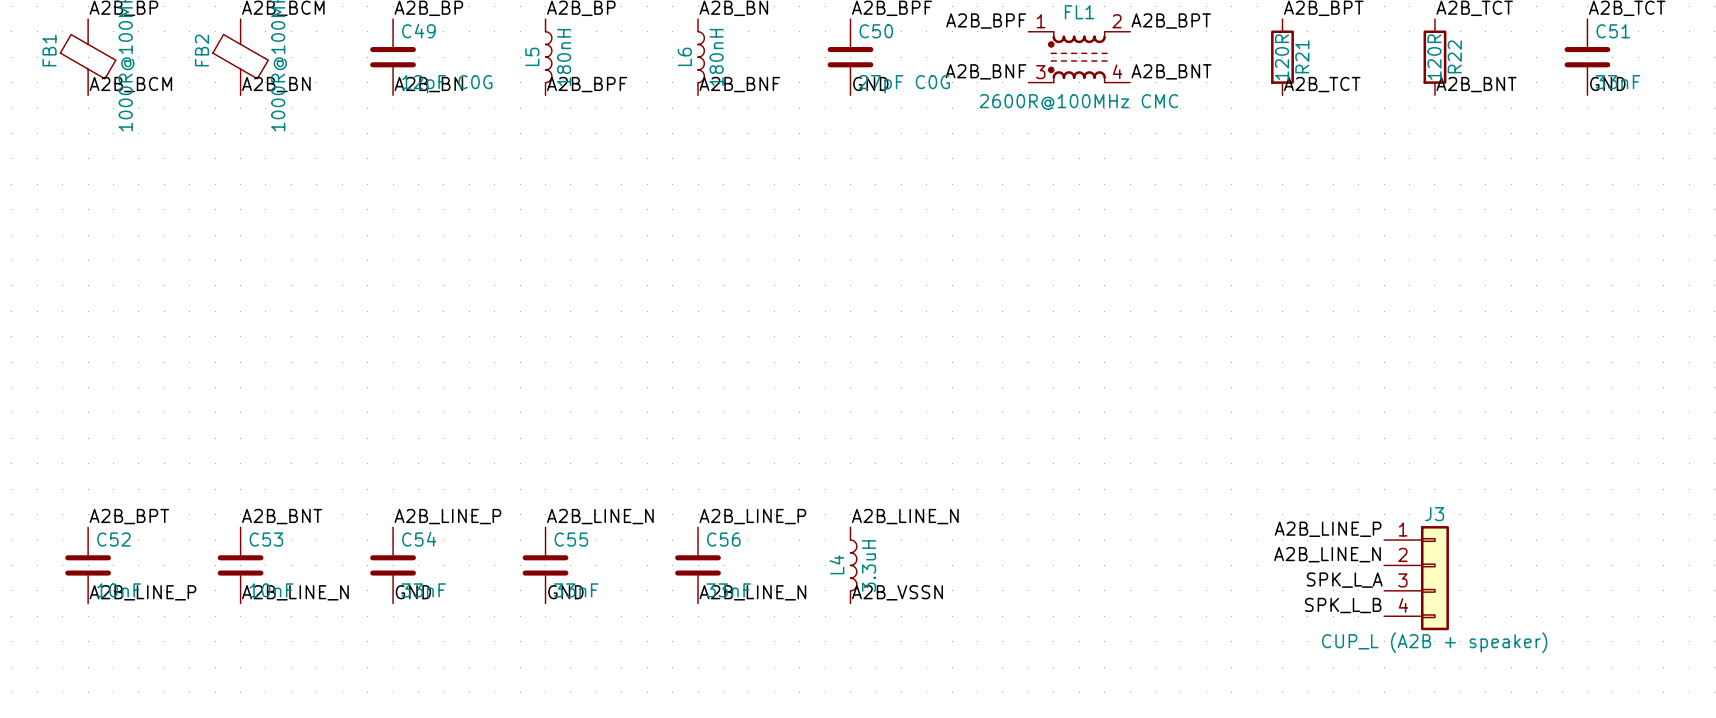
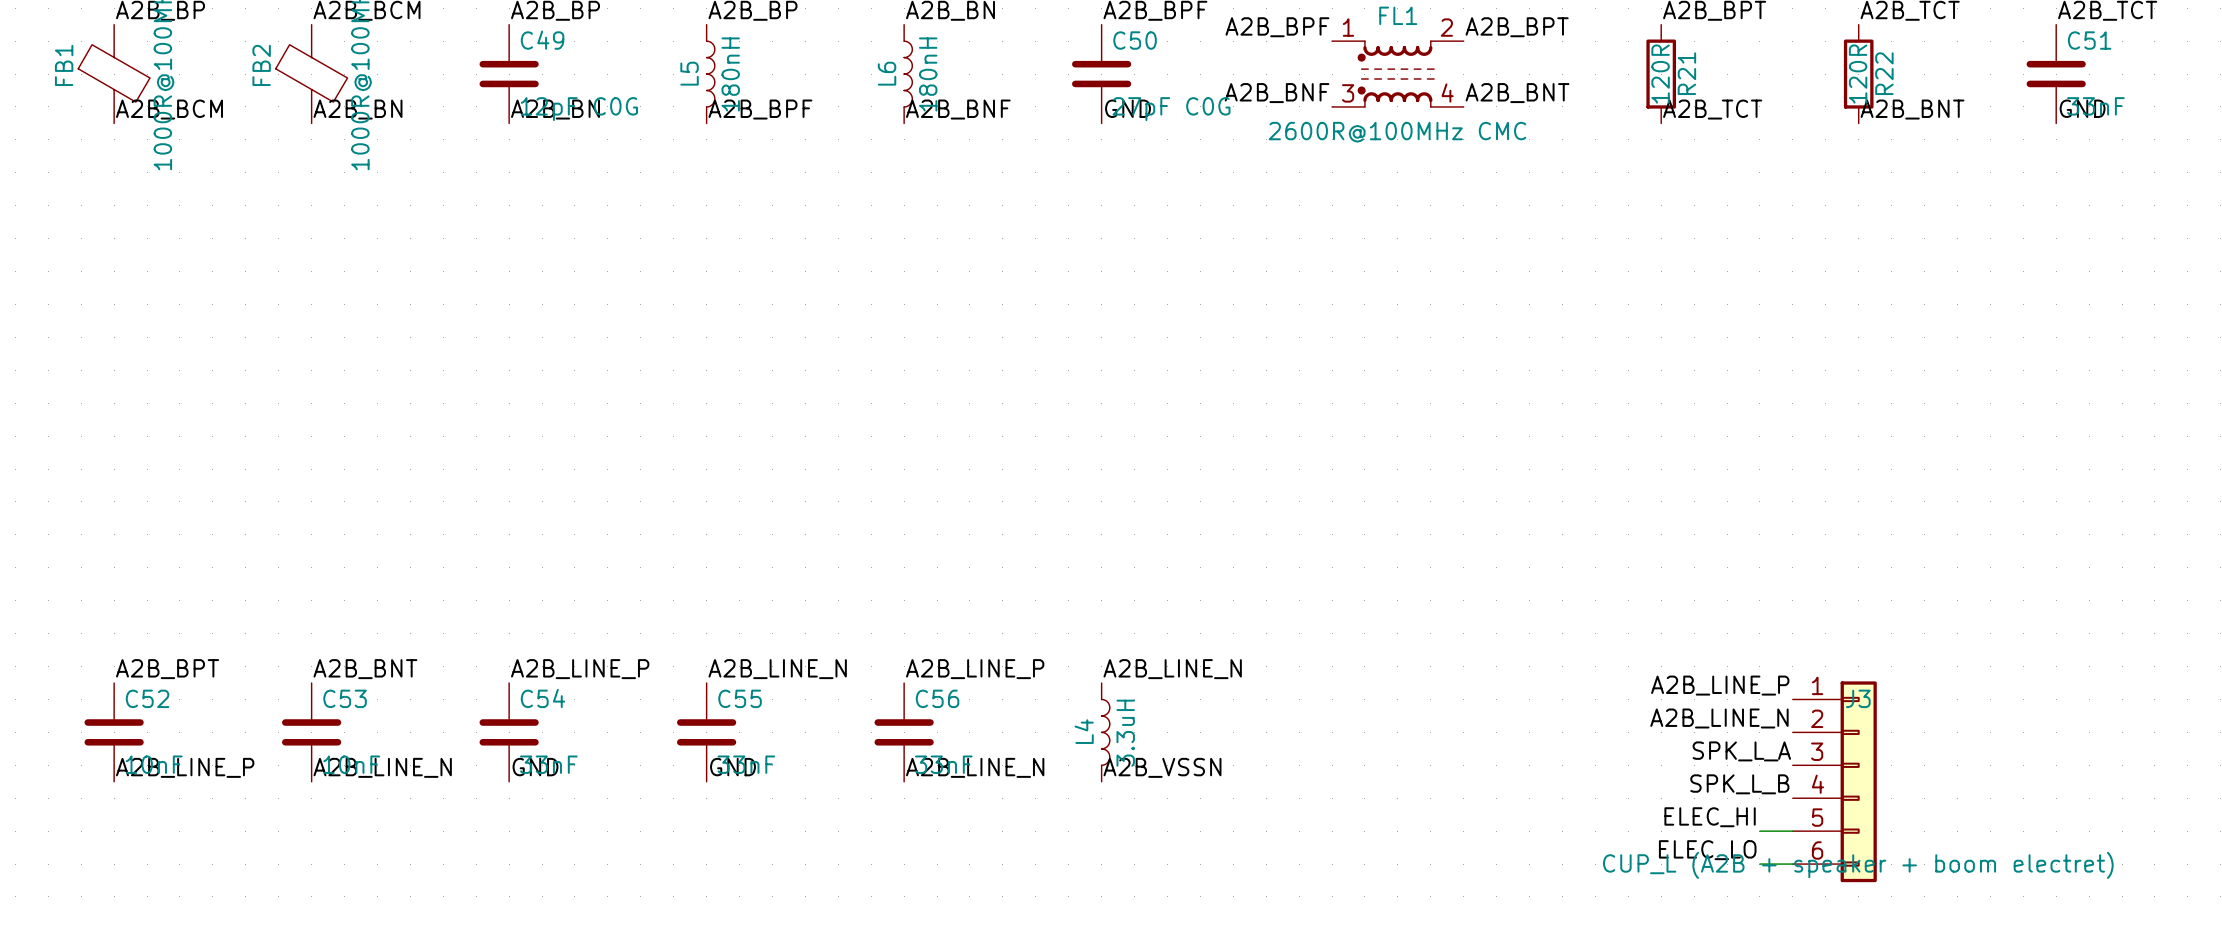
J3 symbol: [1384, 526, 1449, 631] -> [1792, 681, 1877, 883]
label: none -> ELEC_HI (1710, 817)
wire: none -> (1759, 831) (1792, 831)
J3 value: CUP_L (A2B + speaker) (1434, 642) -> CUP_L (A2B + speaker + boom electret) (1858, 865)
label: none -> ELEC_LO (1707, 850)
wire: none -> (1759, 864) (1792, 864)

